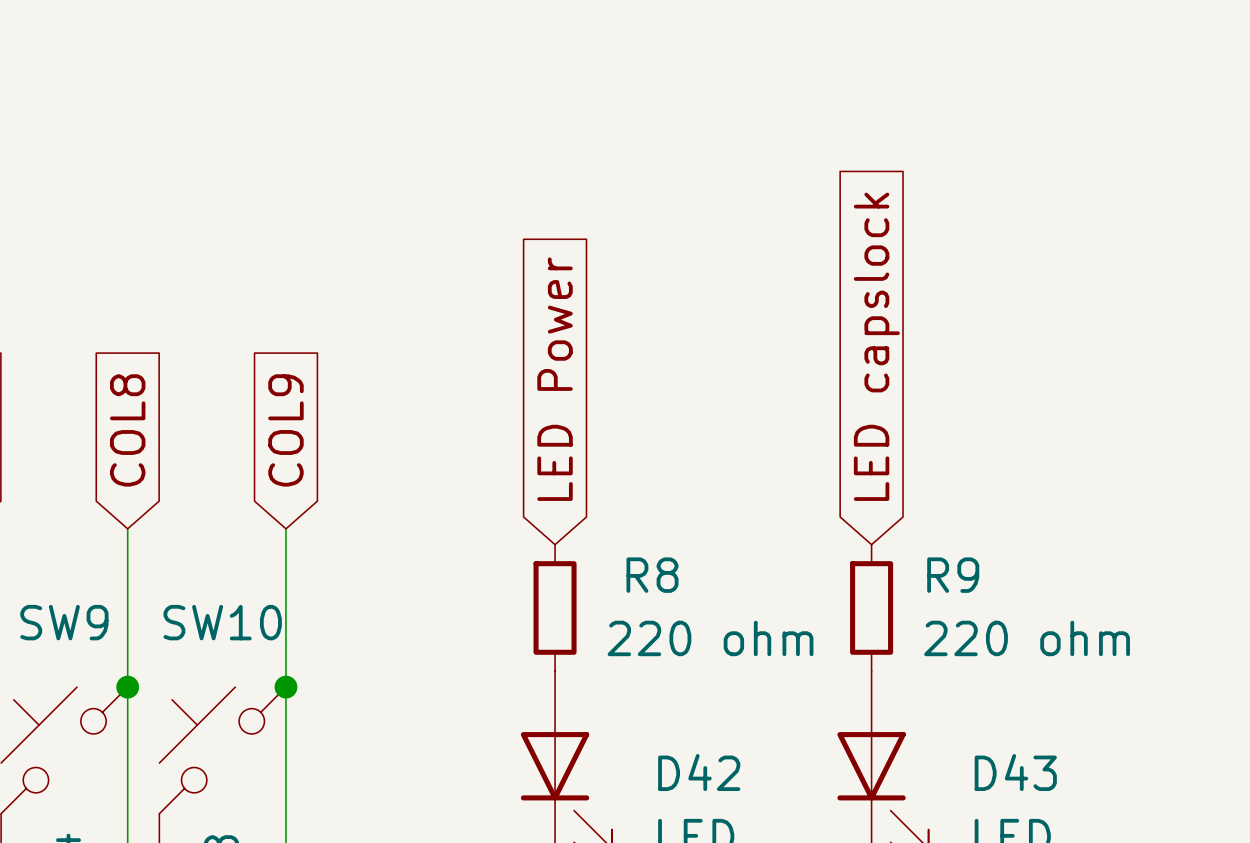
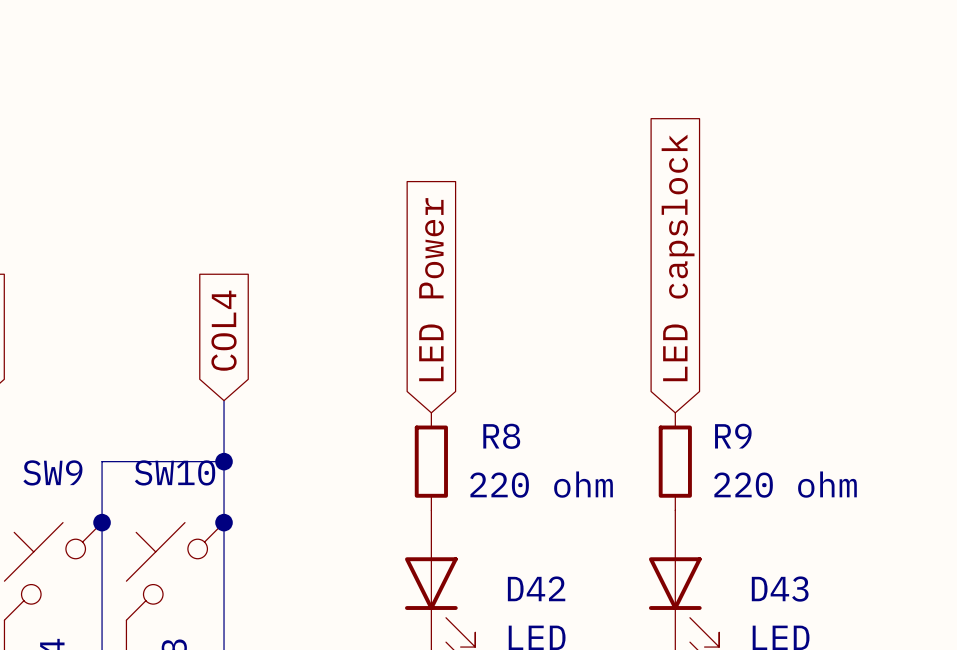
global label: COL8 (127, 430) -> none
global label: COL9 (285, 430) -> COL4 (224, 330)
wire: (127, 528) (127, 607) -> (224, 461) (102, 461)
junction: none -> (224, 461)

